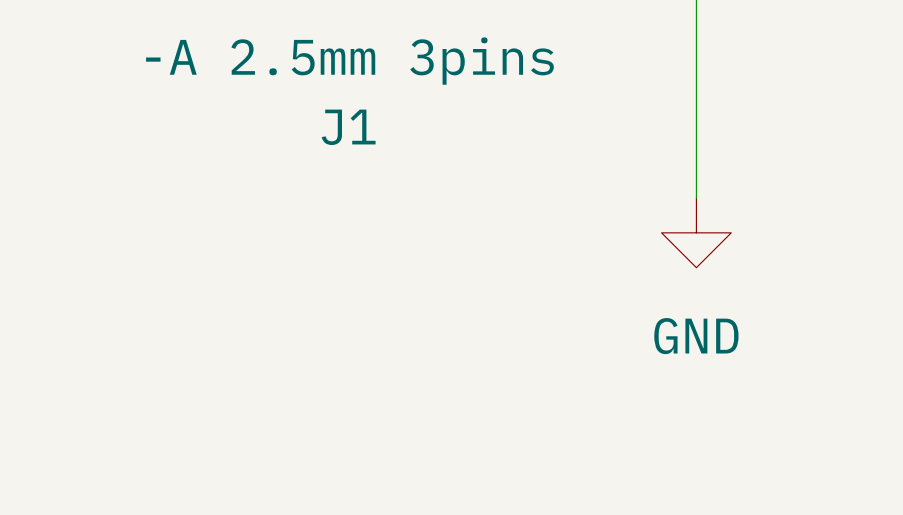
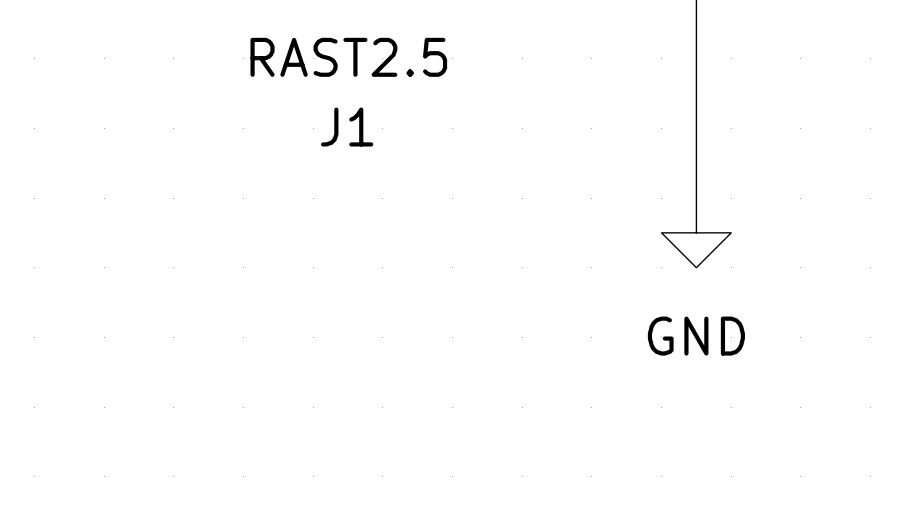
J1 text: -A 2.5mm 3pins (349, 61) -> RAST2.5 (348, 57)

